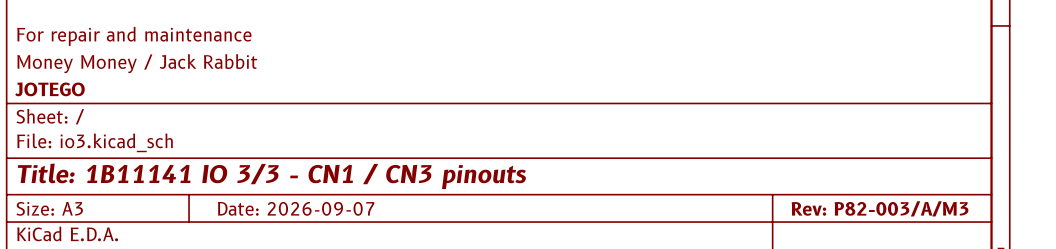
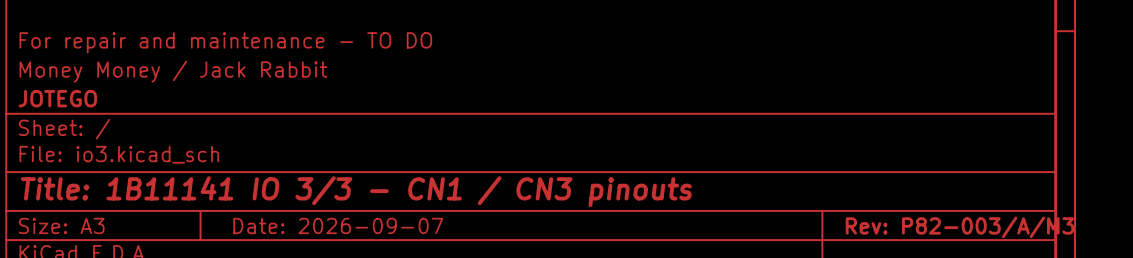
title block: For repair and maintenance (134, 36) -> For repair and maintenance - TO DO (225, 42)

